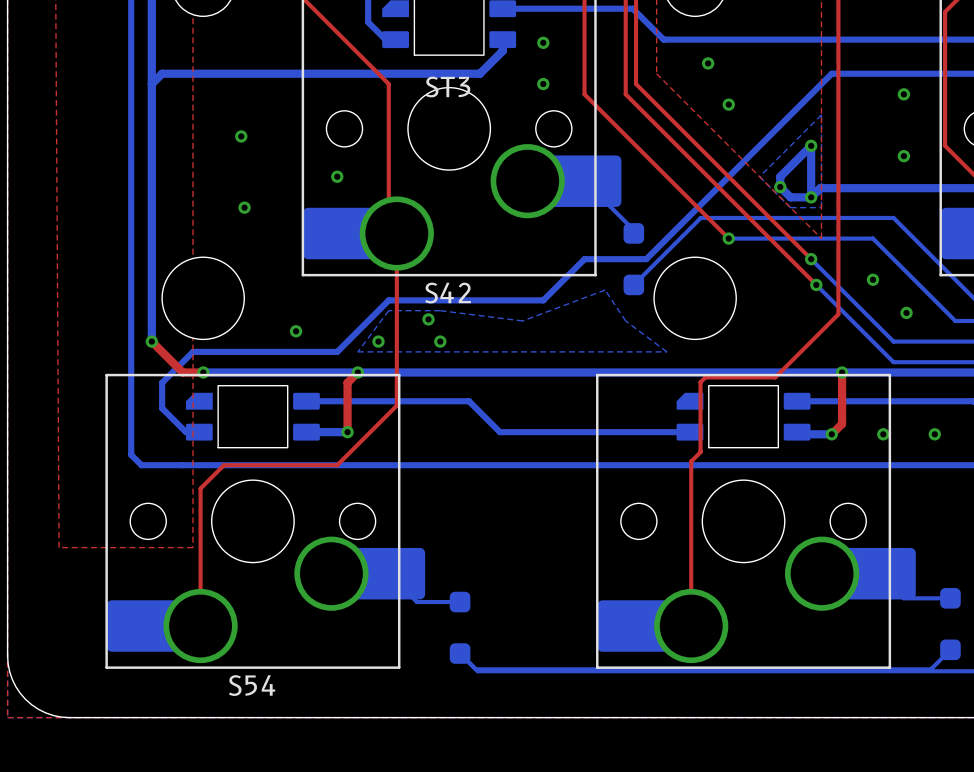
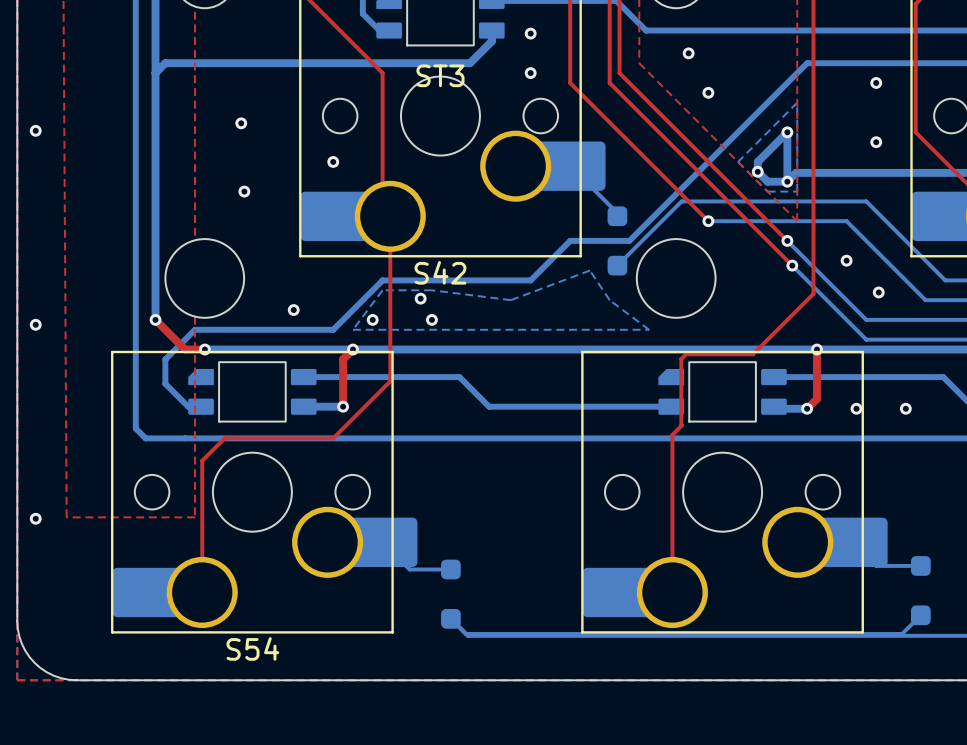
via: none -> (35, 130)
via: none -> (35, 324)
via: none -> (35, 518)

